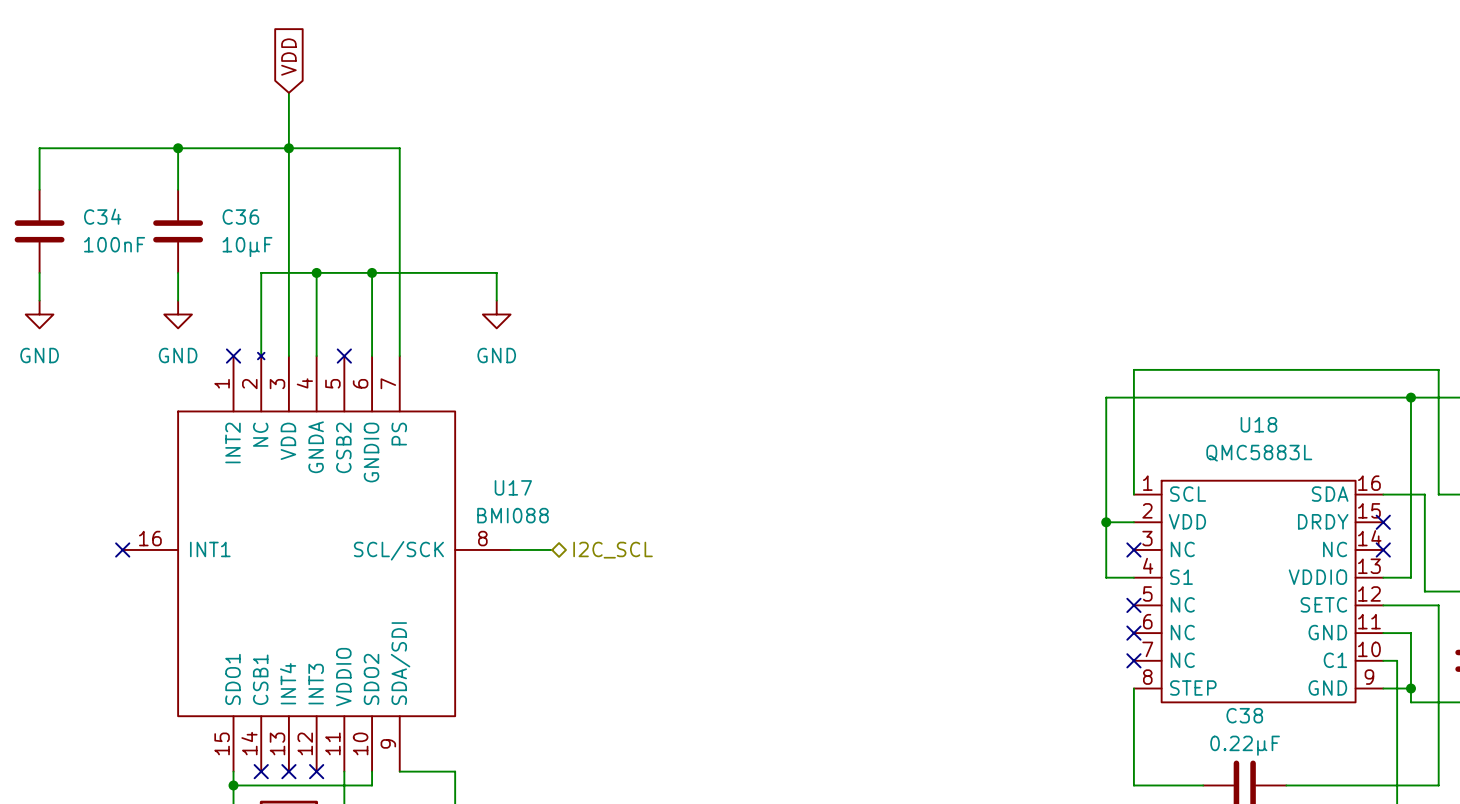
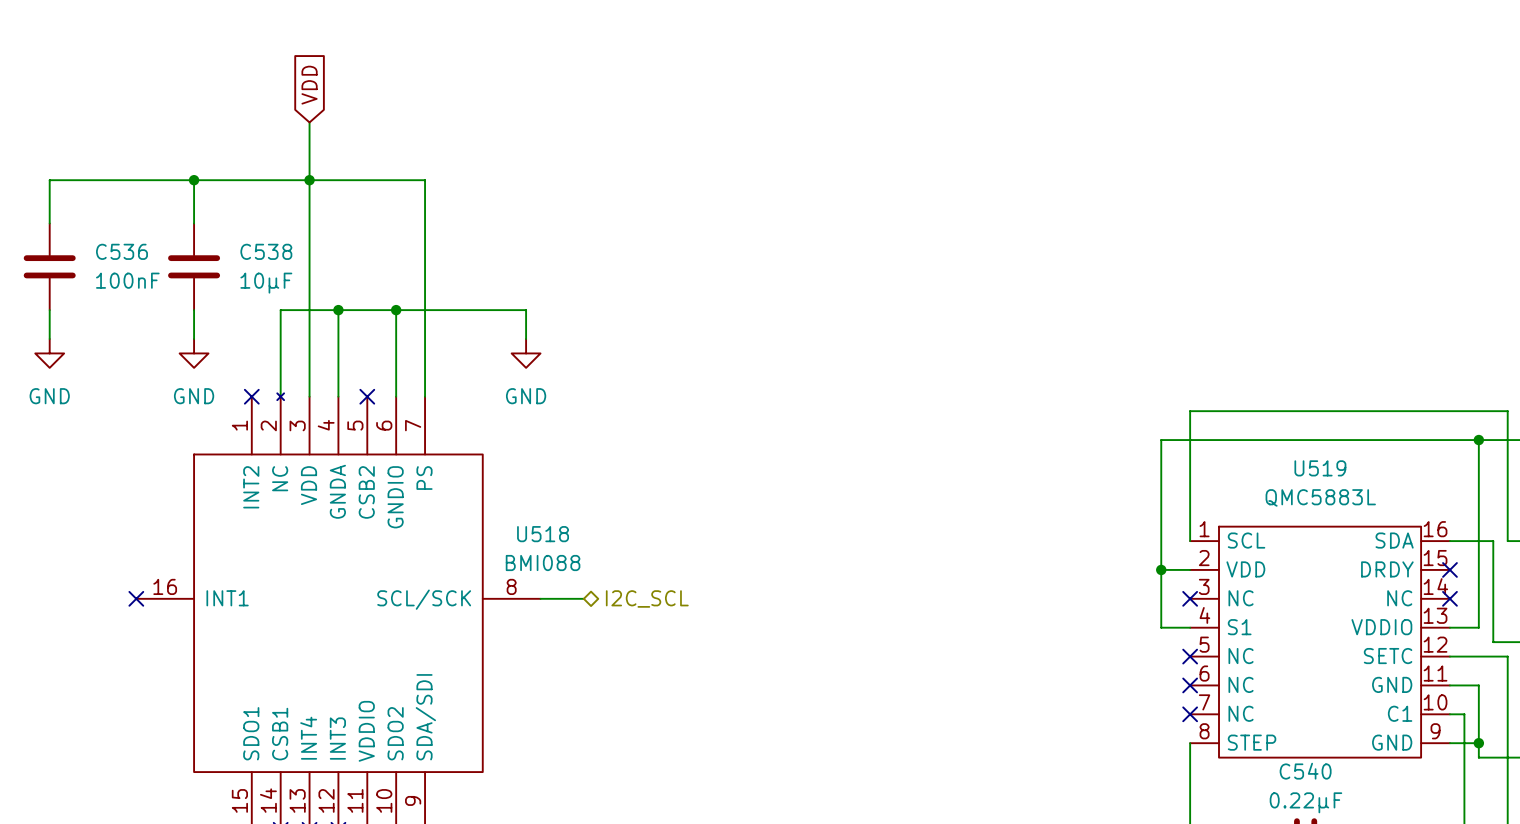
C34 name: C34 (102, 216) -> C536 (121, 251)
C36 name: C36 (240, 217) -> C538 (266, 251)
U18 name: U18 (1258, 424) -> U519 (1320, 468)
U17 name: U17 (513, 487) -> U518 (543, 534)
C38 name: C38 (1244, 715) -> C540 (1305, 771)

